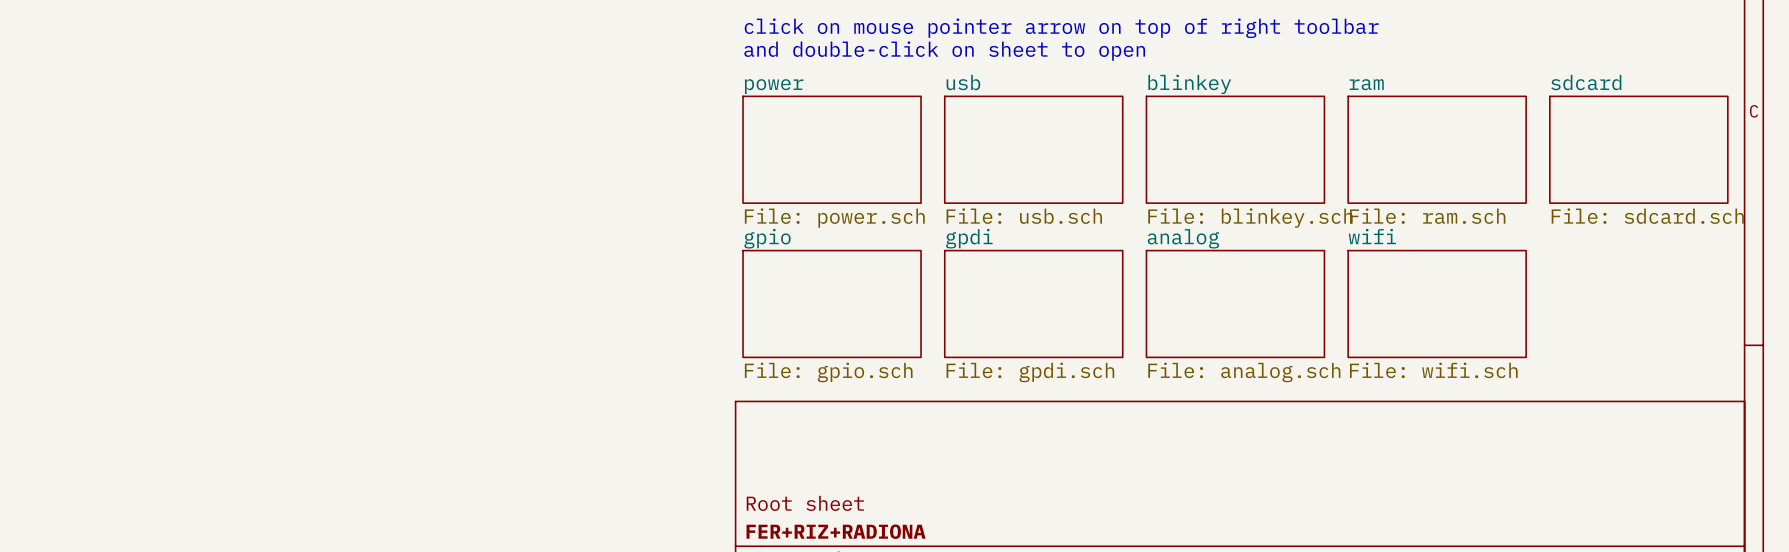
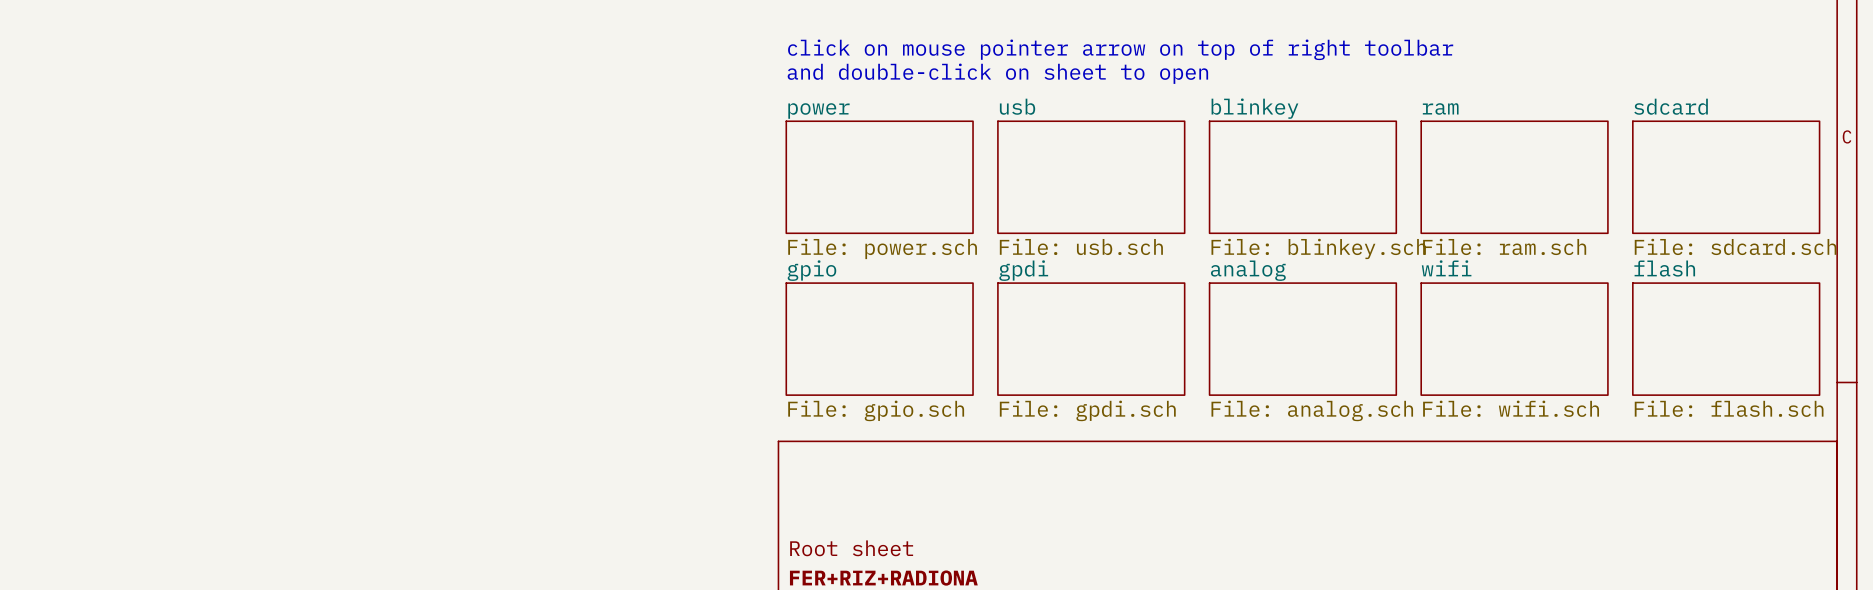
sheet flash: none -> File: flash.sch (1726, 339)

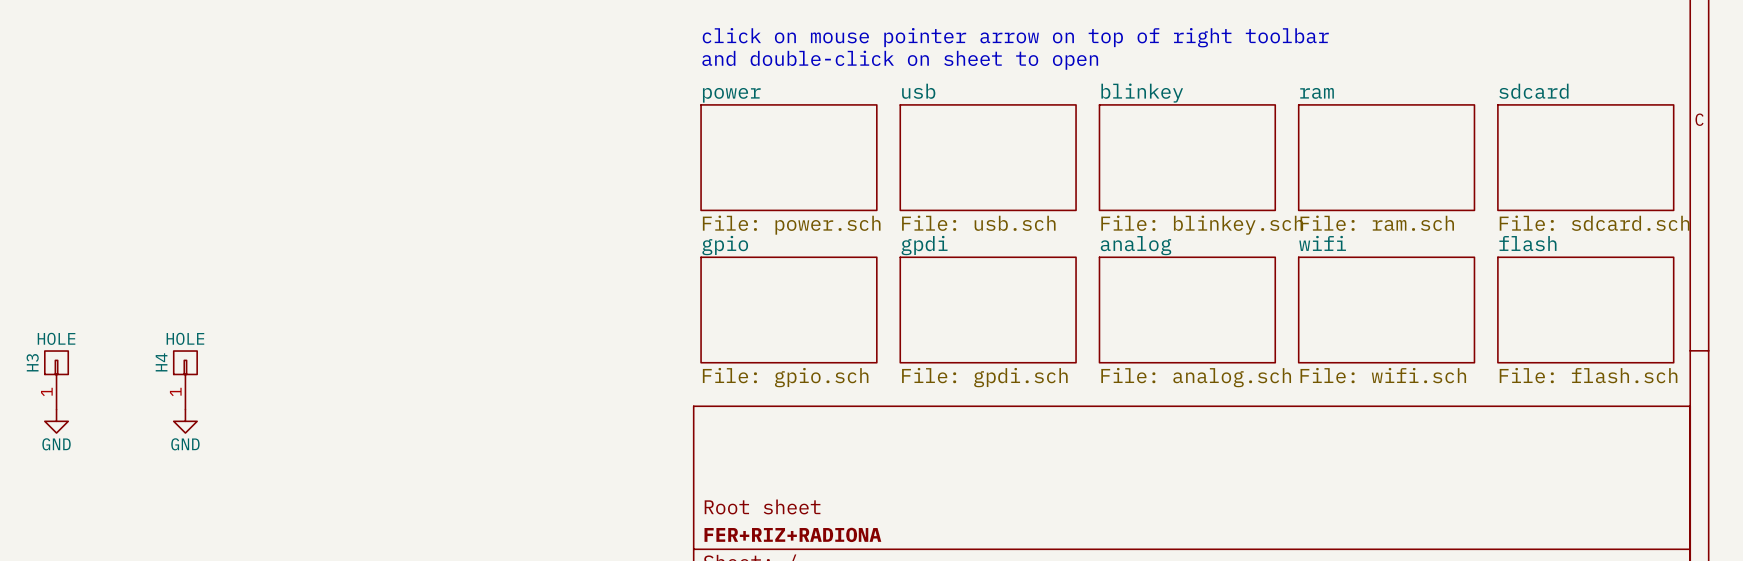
H3: none -> HOLE (56, 380)
H4: none -> HOLE (185, 380)
power symbol: none -> GND (56, 421)
power symbol: none -> GND (185, 421)

